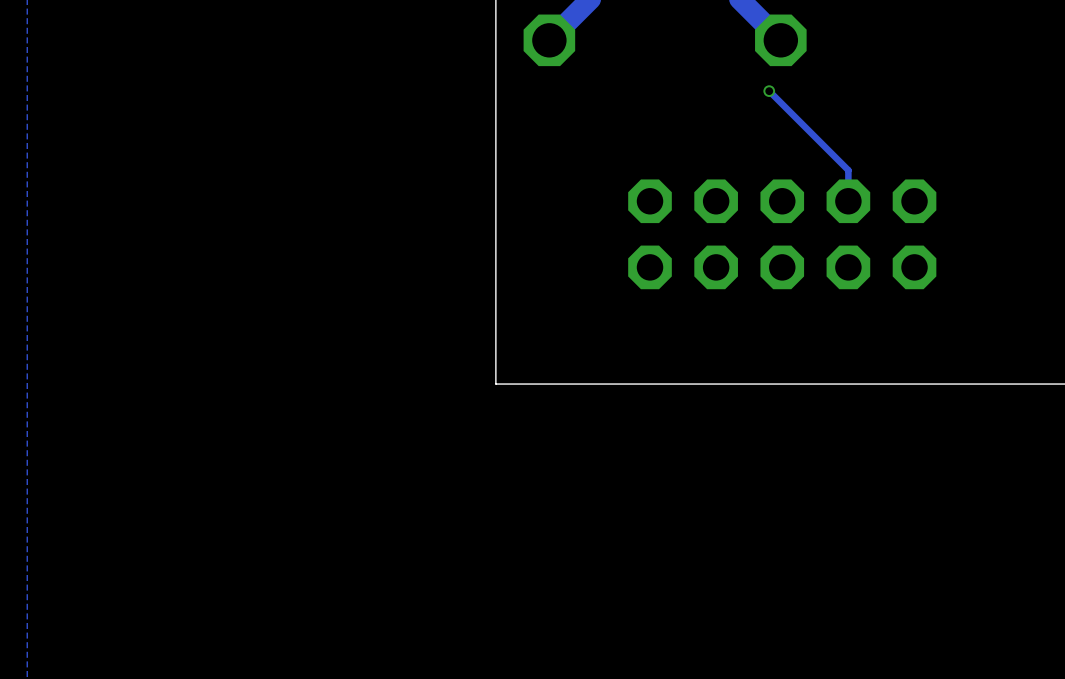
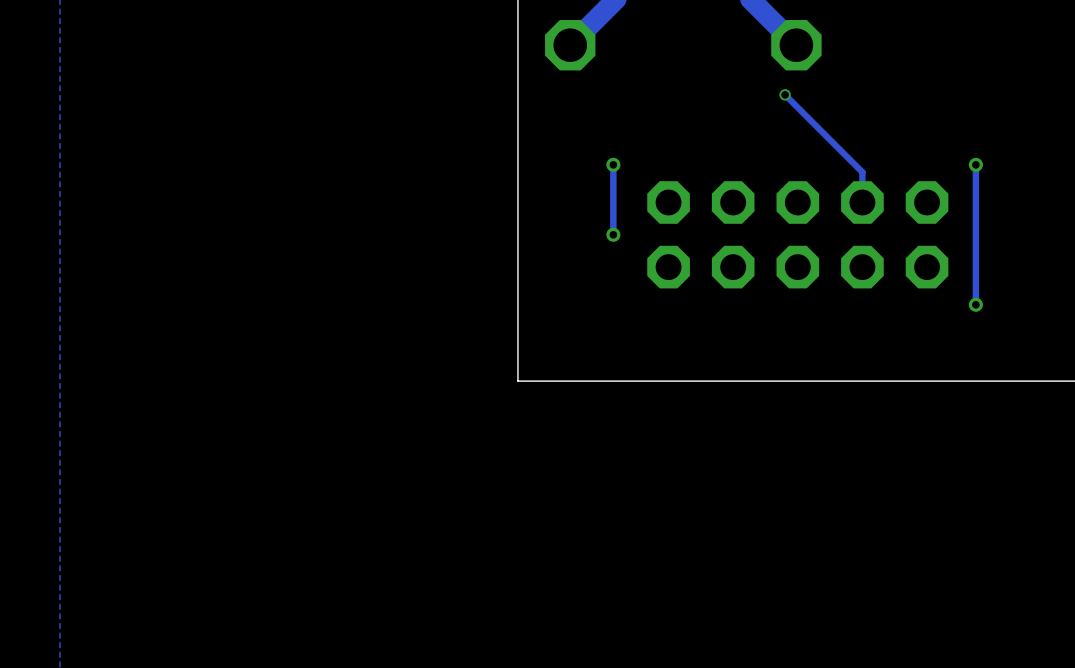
track: none -> (613, 164) (613, 234)
via: none -> (613, 164)
track: none -> (975, 164) (975, 304)
via: none -> (975, 164)
via: none -> (613, 234)
via: none -> (975, 304)

